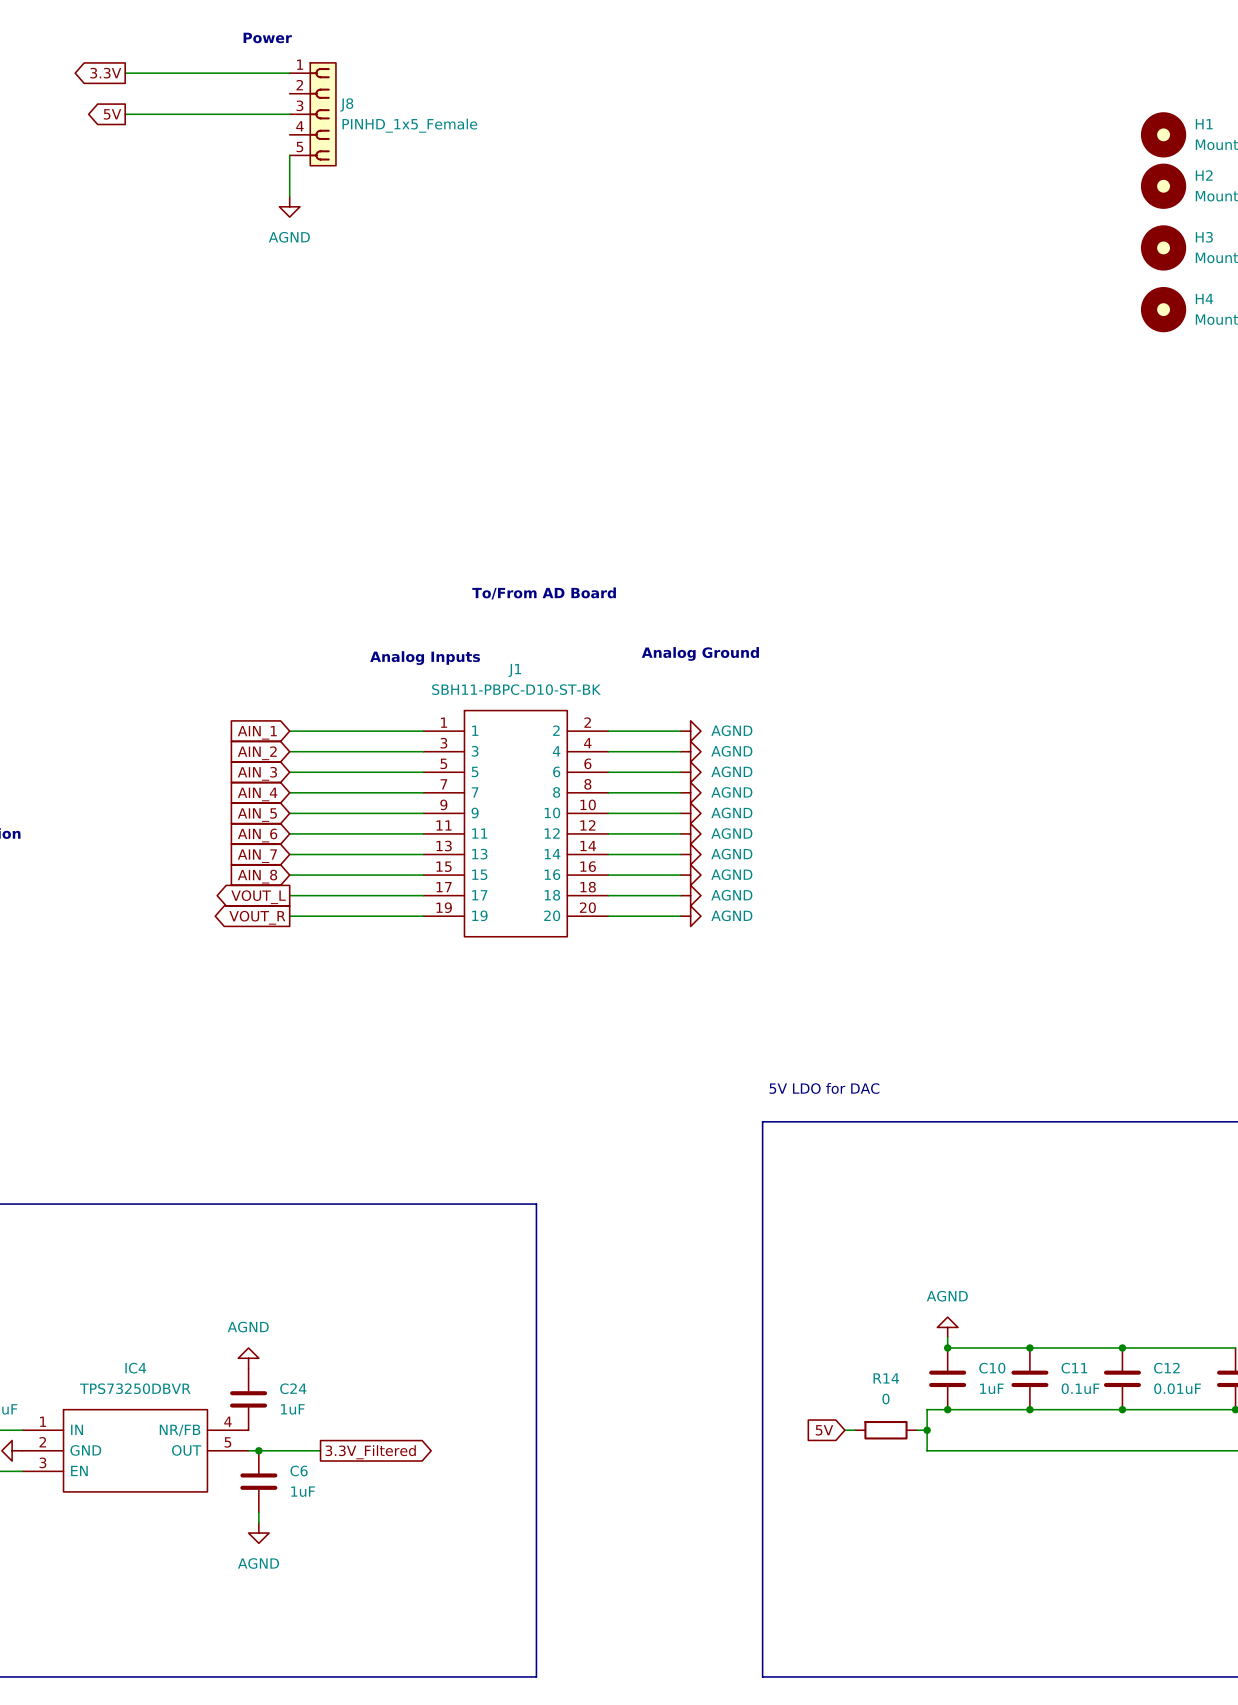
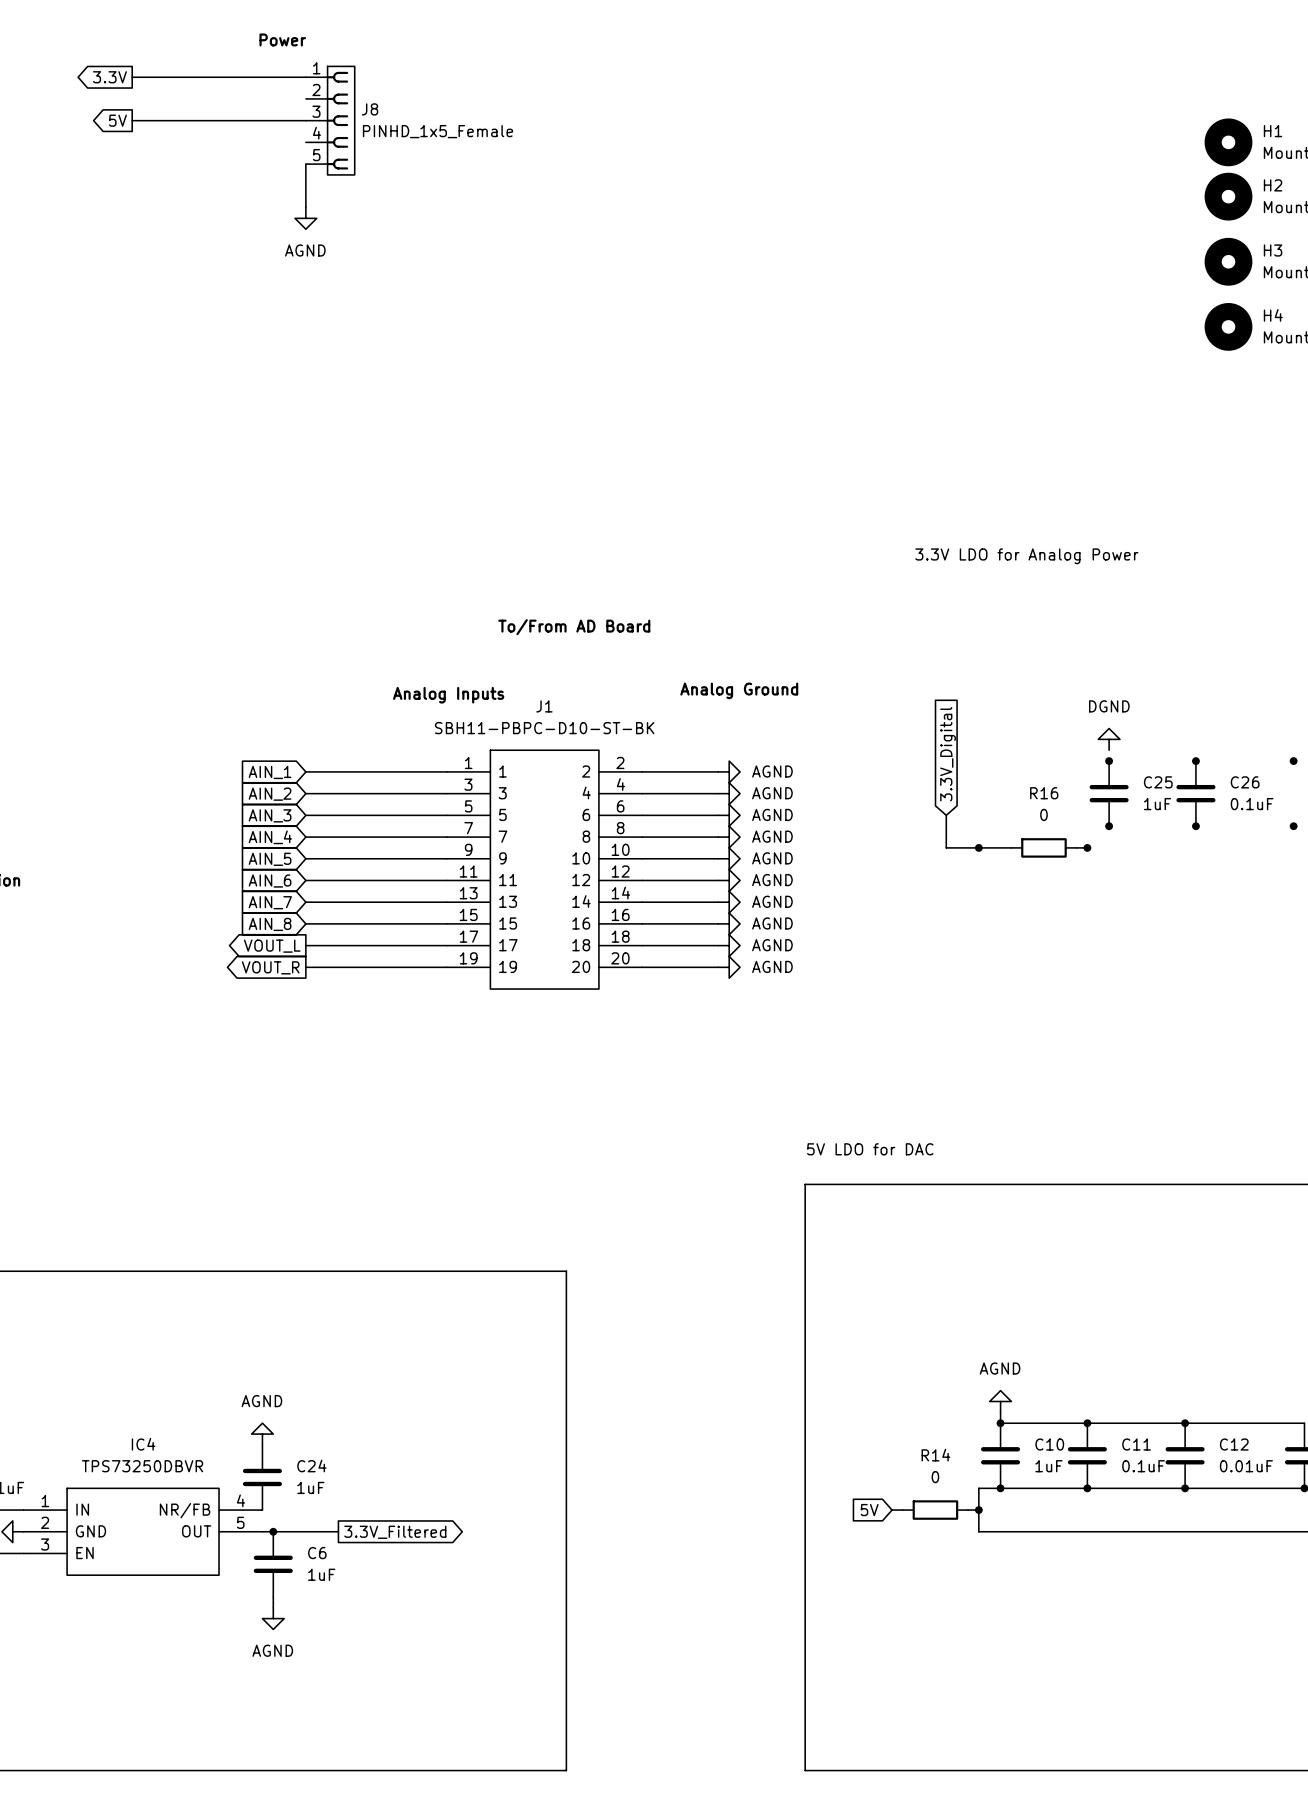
text: none -> 3.3V LDO for Analog Power (1026, 556)
power symbol: none -> DGND (1109, 739)
global label: none -> 3.3V_Digital (948, 754)
junction: none -> (1109, 761)
junction: none -> (1195, 761)
junction: none -> (1293, 761)
C25: none -> 1uF (1109, 793)
C26: none -> 0.1uF (1195, 793)
wire: none -> (946, 815) (946, 847) (1011, 847)
junction: none -> (1109, 826)
junction: none -> (1195, 826)
junction: none -> (1293, 826)
junction: none -> (978, 847)
R16: none -> 0 (1043, 847)
wire: none -> (1076, 847) (1087, 847)
junction: none -> (1087, 847)

